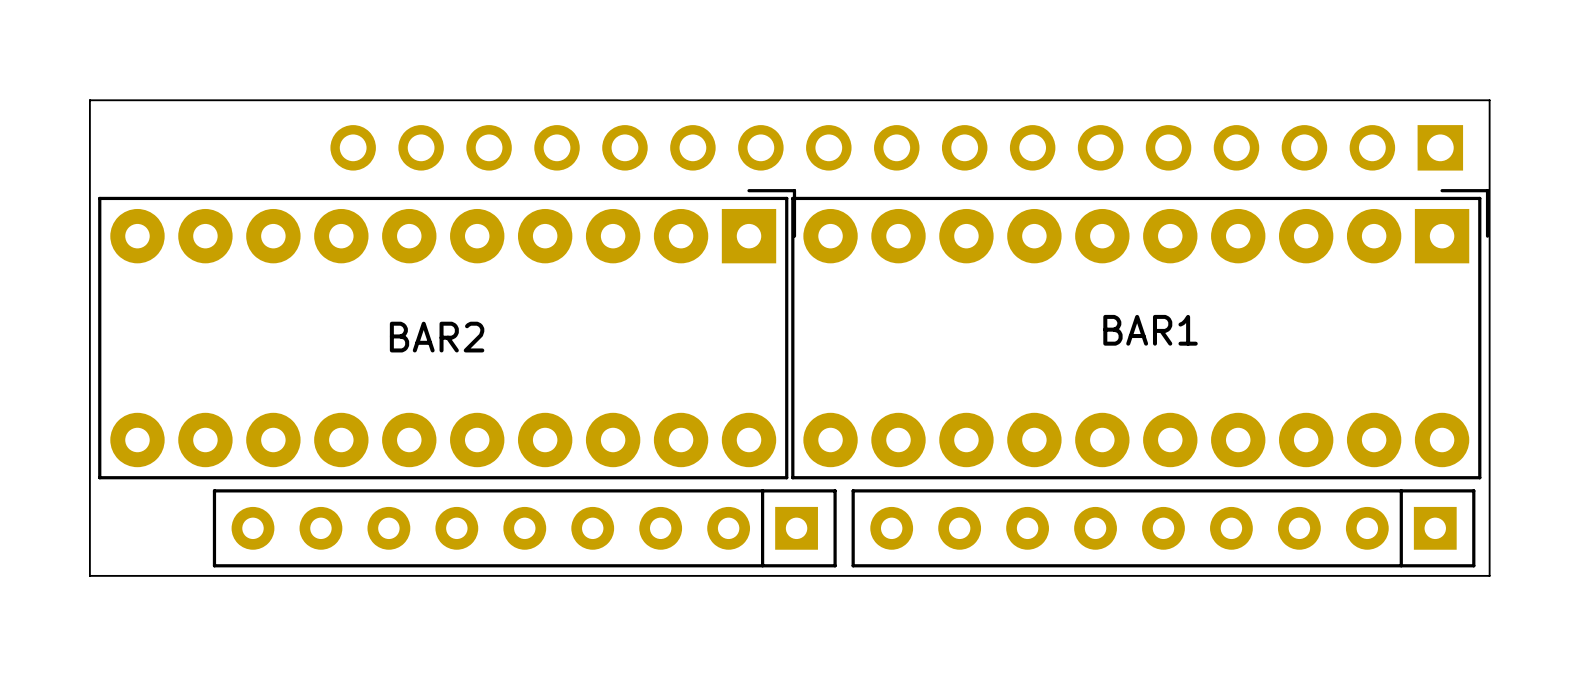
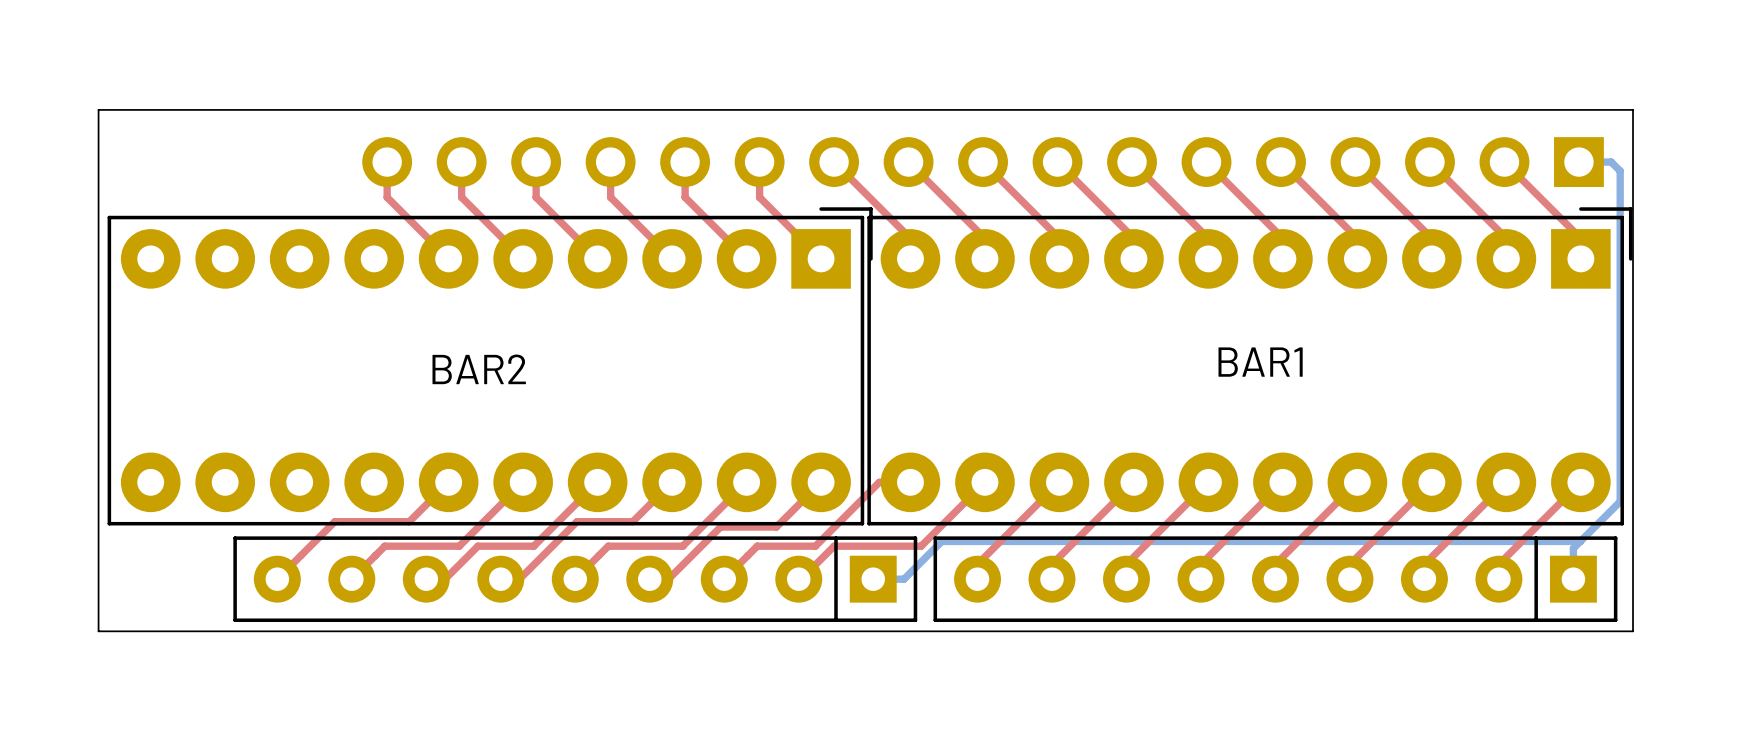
top track: none -> (387, 162) (387, 197) (448, 258)
top track: none -> (461, 162) (461, 197) (523, 258)
top track: none -> (536, 162) (536, 197) (597, 258)
top track: none -> (610, 162) (610, 197) (672, 258)
top track: none -> (685, 162) (685, 197) (746, 258)
top track: none -> (759, 162) (759, 197) (821, 258)
top track: none -> (834, 162) (910, 238) (910, 258)
top track: none -> (908, 162) (984, 238) (984, 258)
top track: none -> (983, 162) (1059, 238) (1059, 258)
top track: none -> (1057, 162) (1133, 238) (1133, 258)
top track: none -> (1132, 162) (1208, 238) (1208, 258)
top track: none -> (1206, 162) (1282, 238) (1282, 258)
top track: none -> (1281, 162) (1357, 238) (1357, 258)
top track: none -> (1355, 162) (1431, 238) (1431, 258)
top track: none -> (1429, 162) (1506, 238) (1506, 258)
top track: none -> (1504, 162) (1580, 238) (1580, 258)
bottom track: none -> (1578, 162) (1611, 162) (1620, 171) (1620, 501) (1573, 548) (1573, 579)
top track: none -> (448, 482) (409, 521) (334, 521) (277, 579)
top track: none -> (523, 482) (459, 546) (384, 546) (351, 579)
top track: none -> (597, 482) (533, 546) (477, 546) (444, 579) (426, 579)
top track: none -> (672, 482) (632, 521) (576, 521) (519, 579) (500, 579)
top track: none -> (746, 482) (682, 546) (608, 546) (575, 579)
top track: none -> (821, 482) (776, 527) (720, 527) (668, 579) (649, 579)
top track: none -> (910, 482) (879, 482) (815, 546) (757, 546) (724, 579)
top track: none -> (984, 482) (921, 546) (834, 546) (801, 579) (798, 579)
top track: none -> (1059, 482) (977, 564) (977, 579)
top track: none -> (1133, 482) (1052, 564) (1052, 579)
top track: none -> (1208, 482) (1126, 564) (1126, 579)
top track: none -> (1282, 482) (1200, 564) (1200, 579)
top track: none -> (1357, 482) (1275, 564) (1275, 579)
top track: none -> (1431, 482) (1349, 564) (1349, 579)
top track: none -> (1506, 482) (1424, 564) (1424, 579)
top track: none -> (1580, 482) (1498, 564) (1498, 579)
bottom track: none -> (1580, 541) (941, 541) (904, 579) (873, 579)

